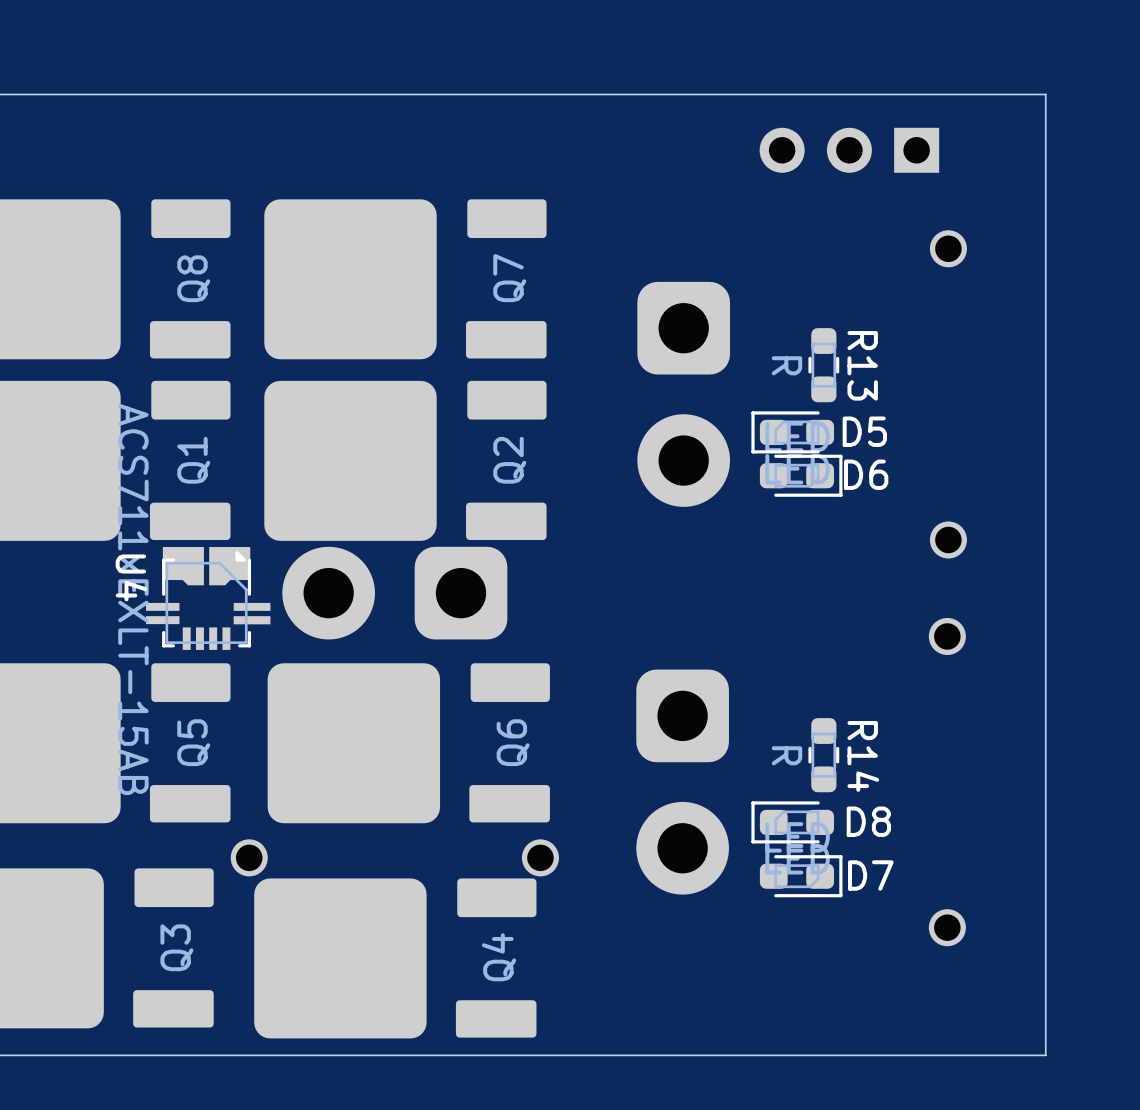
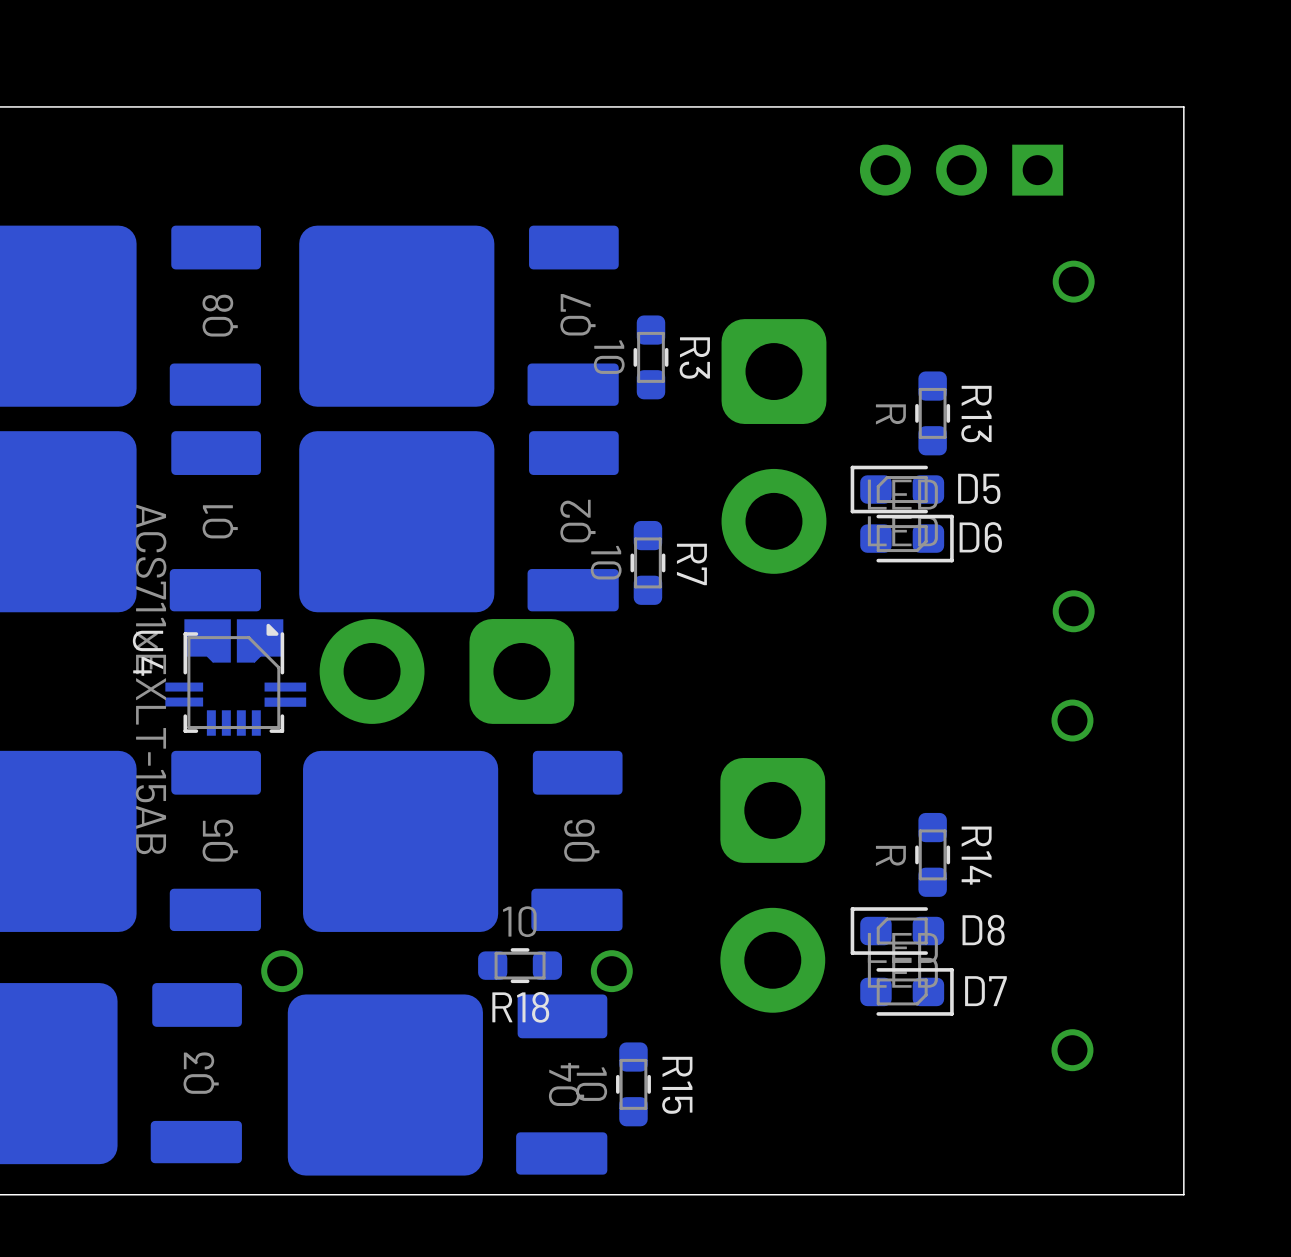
R3: none -> 10 (650, 357)
R7: none -> 10 (647, 562)
R18: none -> 10 (520, 965)
R15: none -> 10 (633, 1084)

